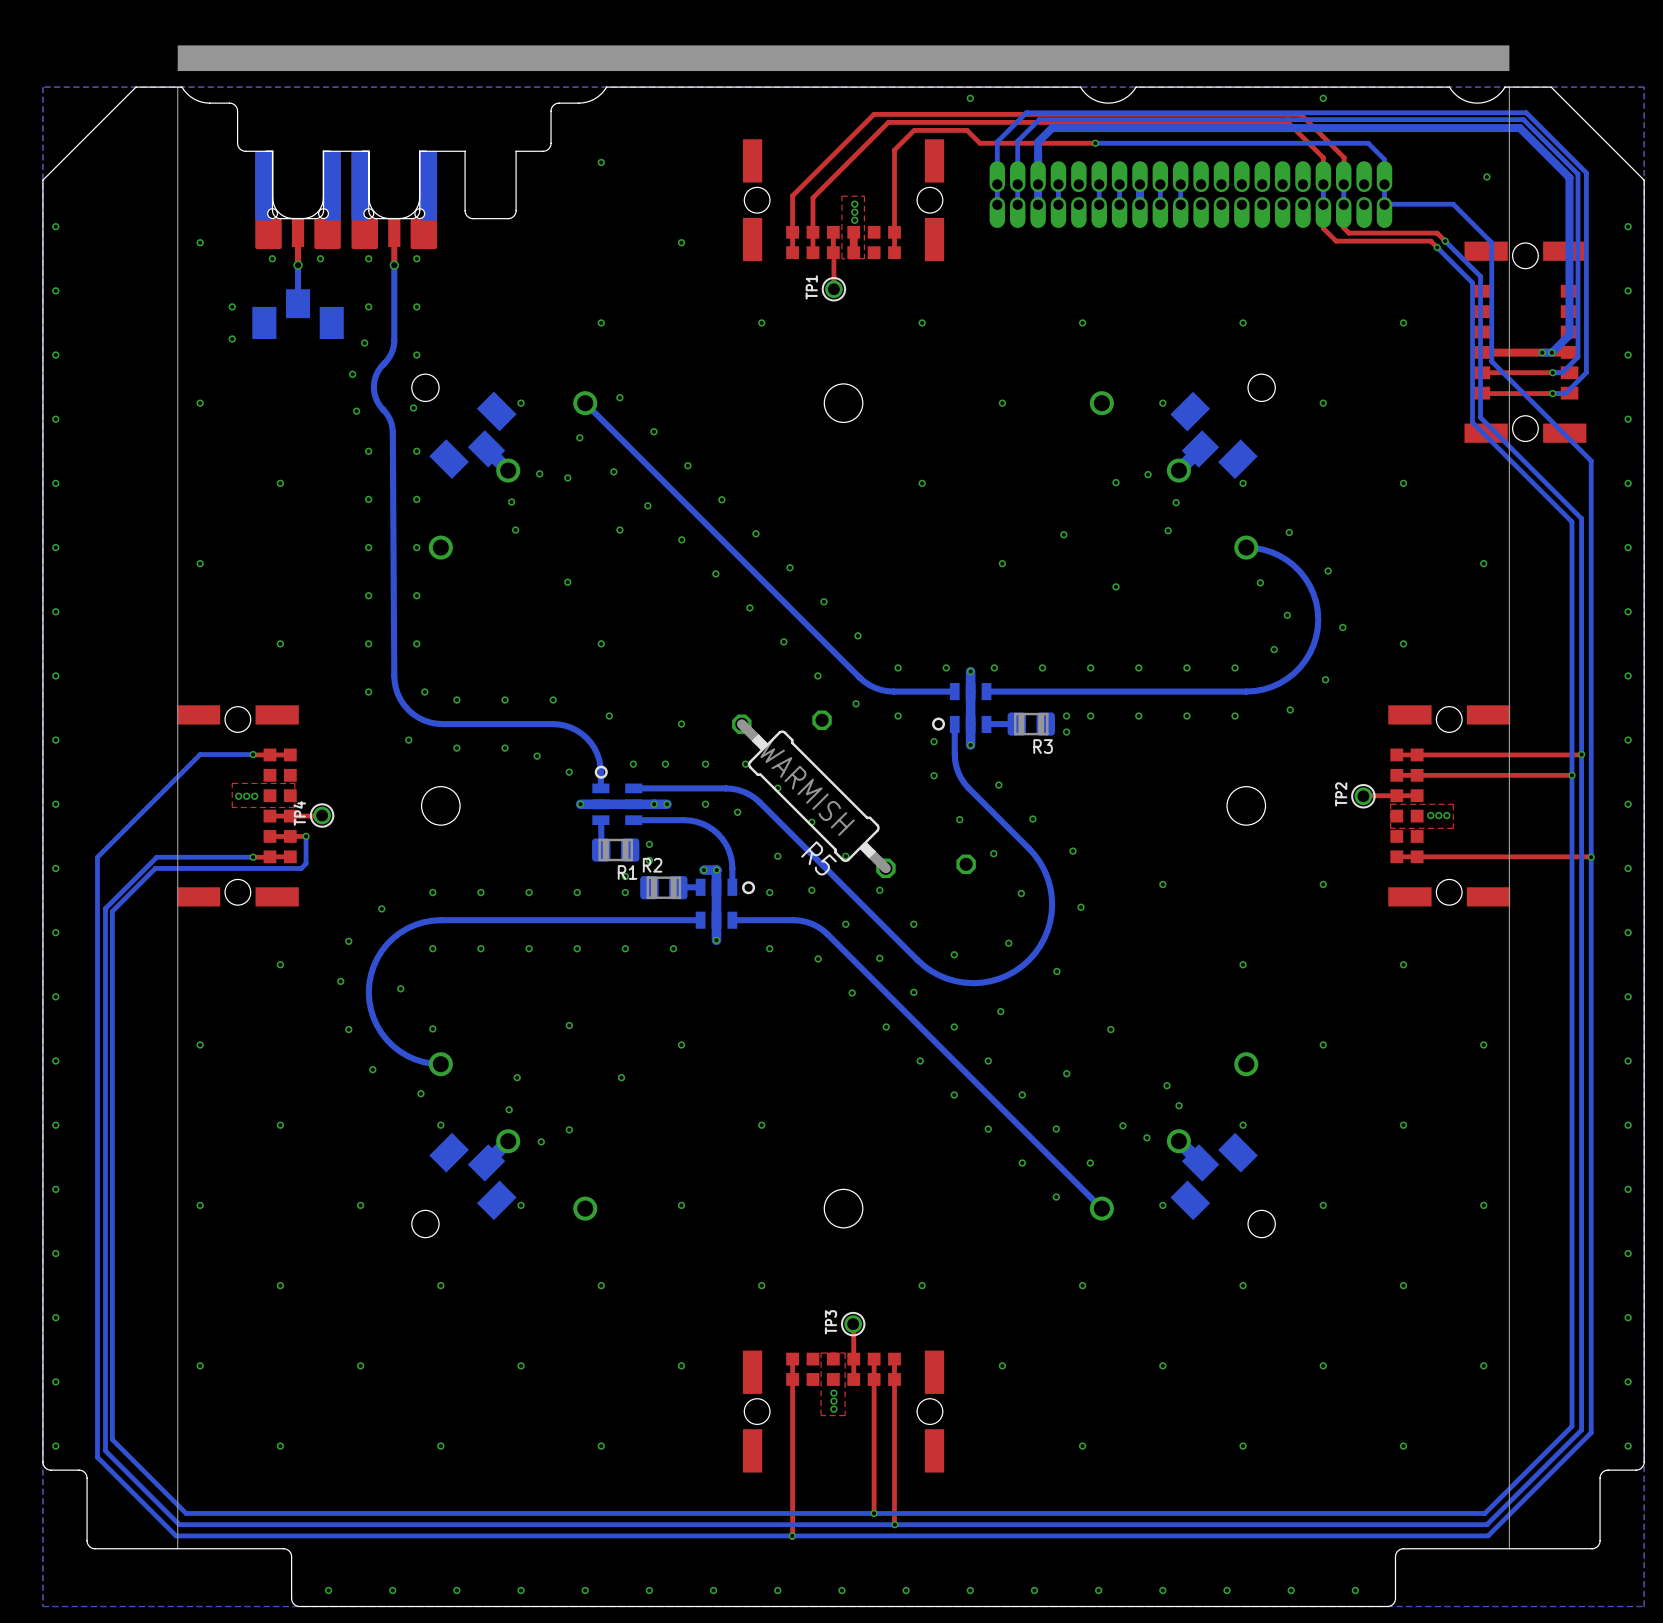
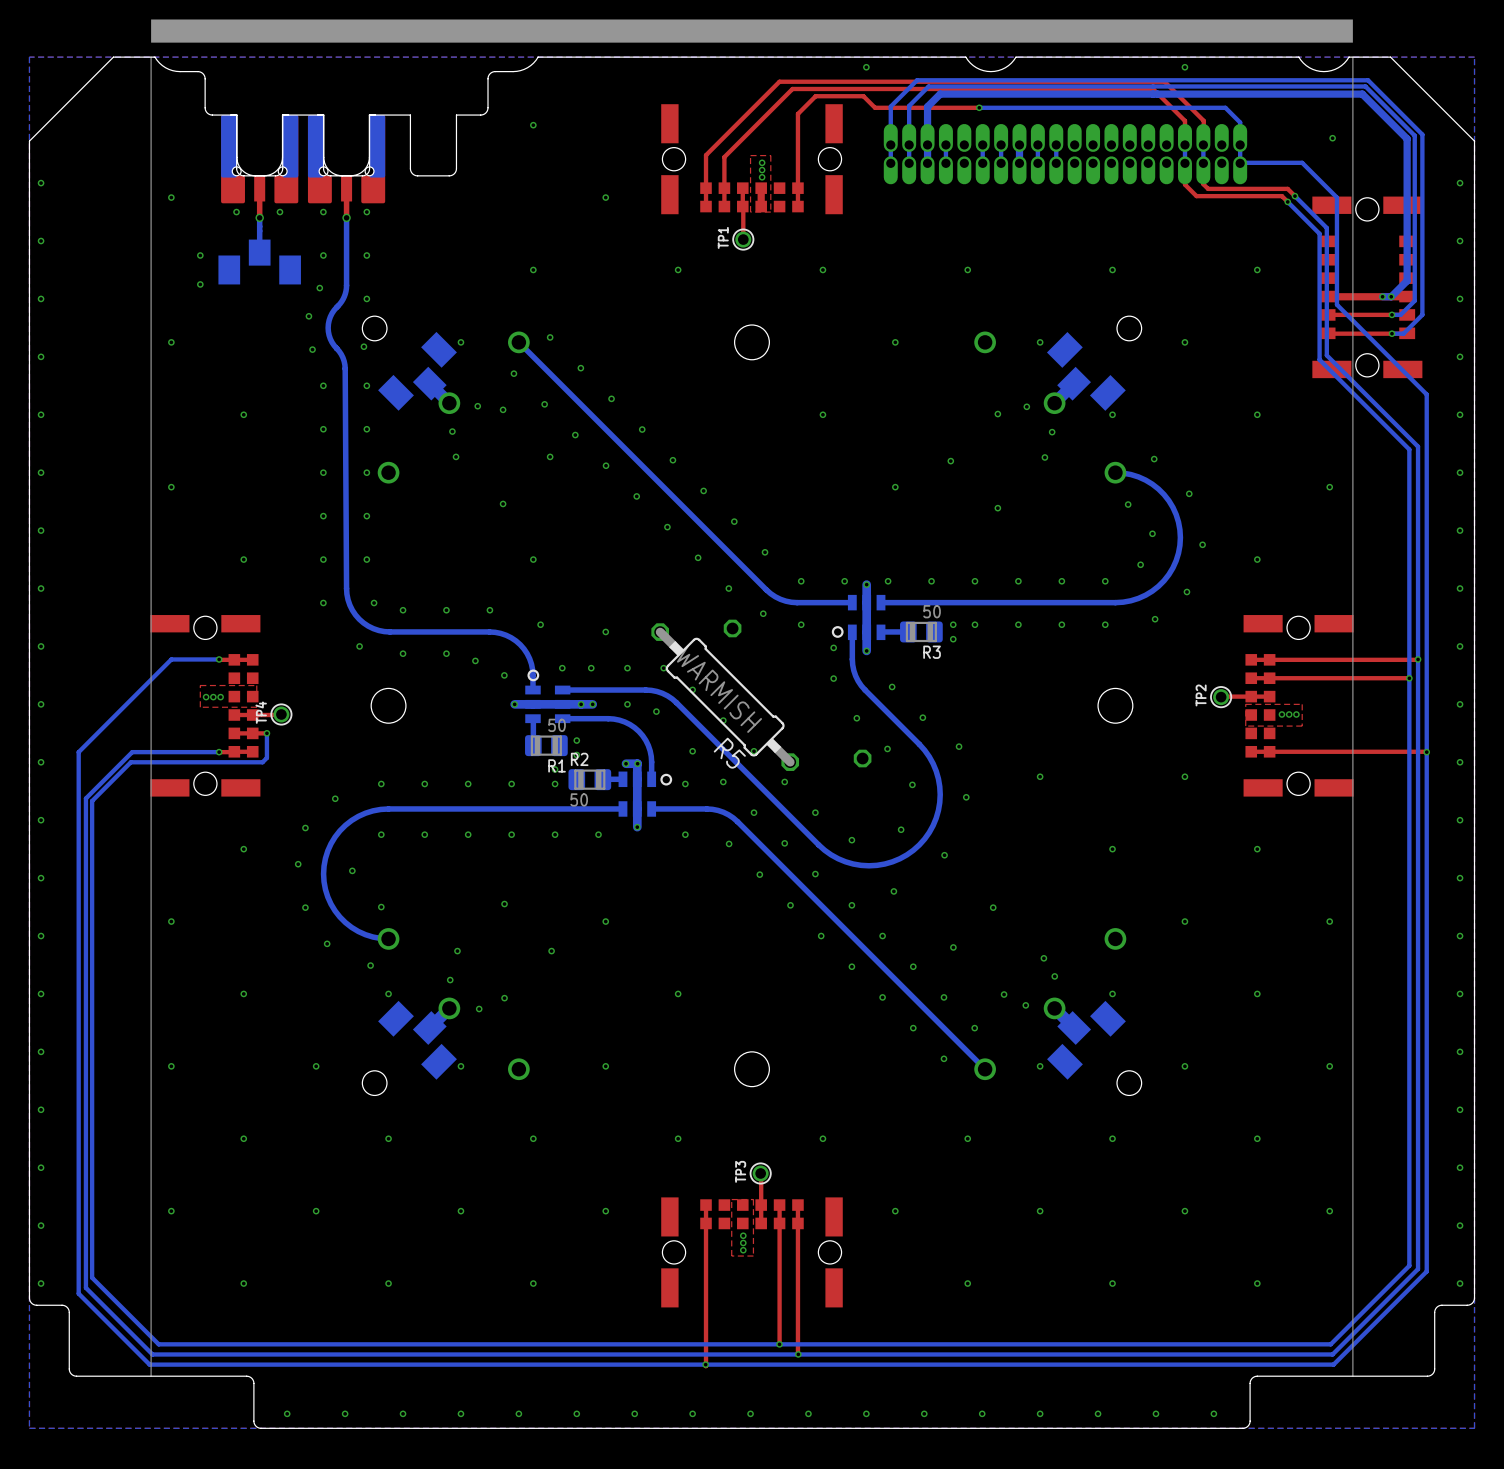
R3 value: none -> 50 (932, 611)
R1 value: none -> 50 (557, 725)
R2 value: none -> 50 (579, 799)

